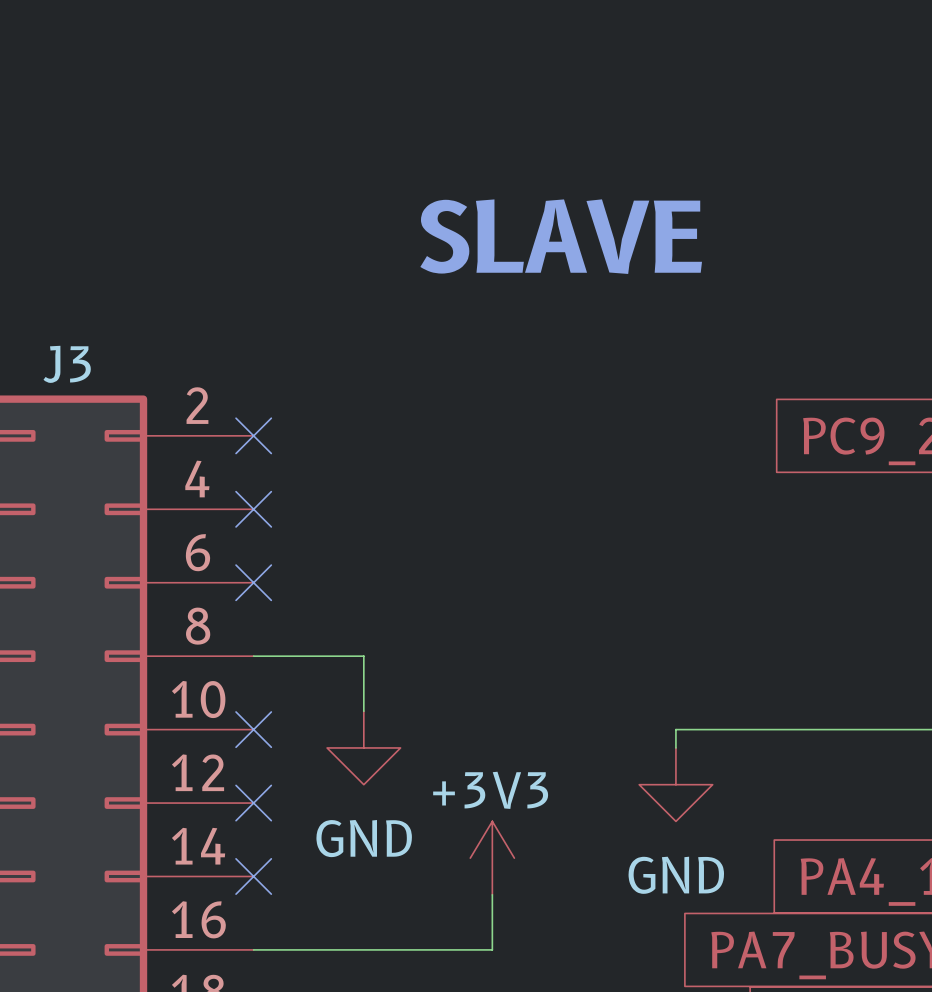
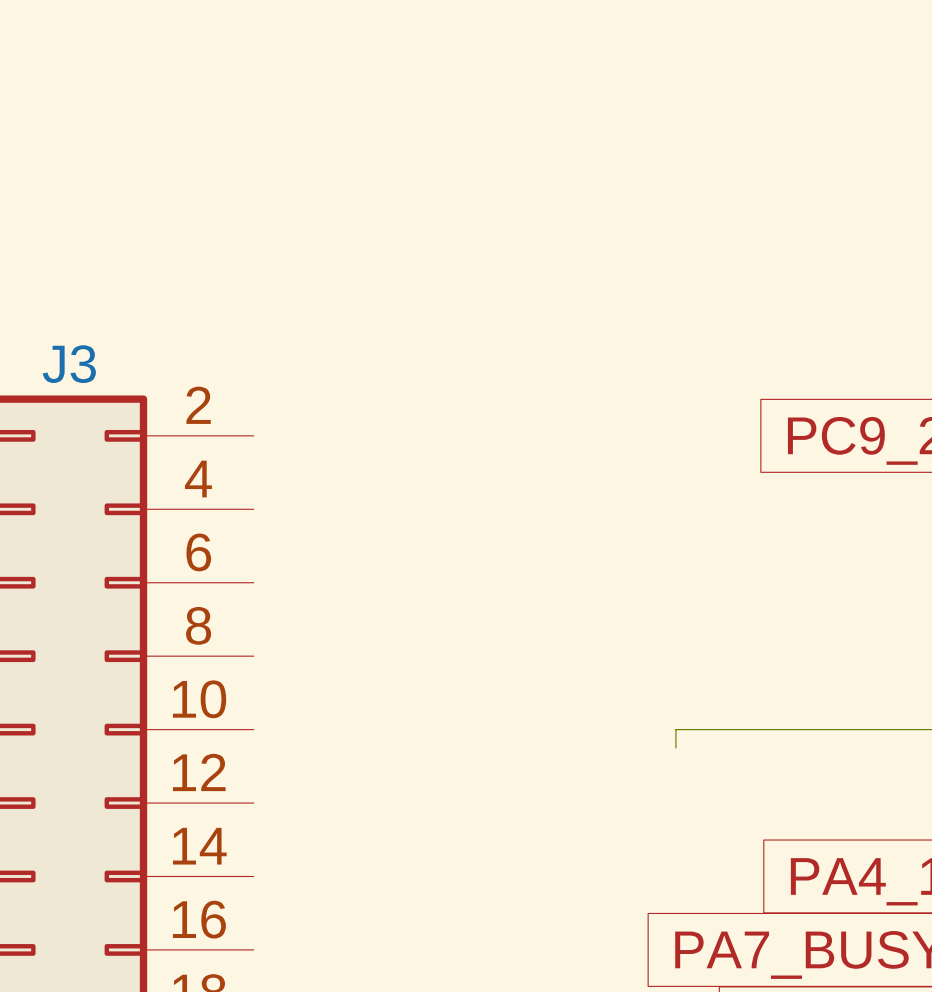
text: SLAVE (561, 236) -> none
no-connect mark: (253, 435) -> none
no-connect mark: (253, 509) -> none
no-connect mark: (253, 582) -> none
wire: (253, 656) (363, 656) (363, 711) -> none
no-connect mark: (253, 729) -> none
power symbol: GND (363, 747) -> none
power symbol: GND (675, 784) -> none
no-connect mark: (253, 803) -> none
power symbol: +3V3 (492, 858) -> none
no-connect mark: (253, 876) -> none
wire: (492, 894) (492, 949) (253, 949) -> none

